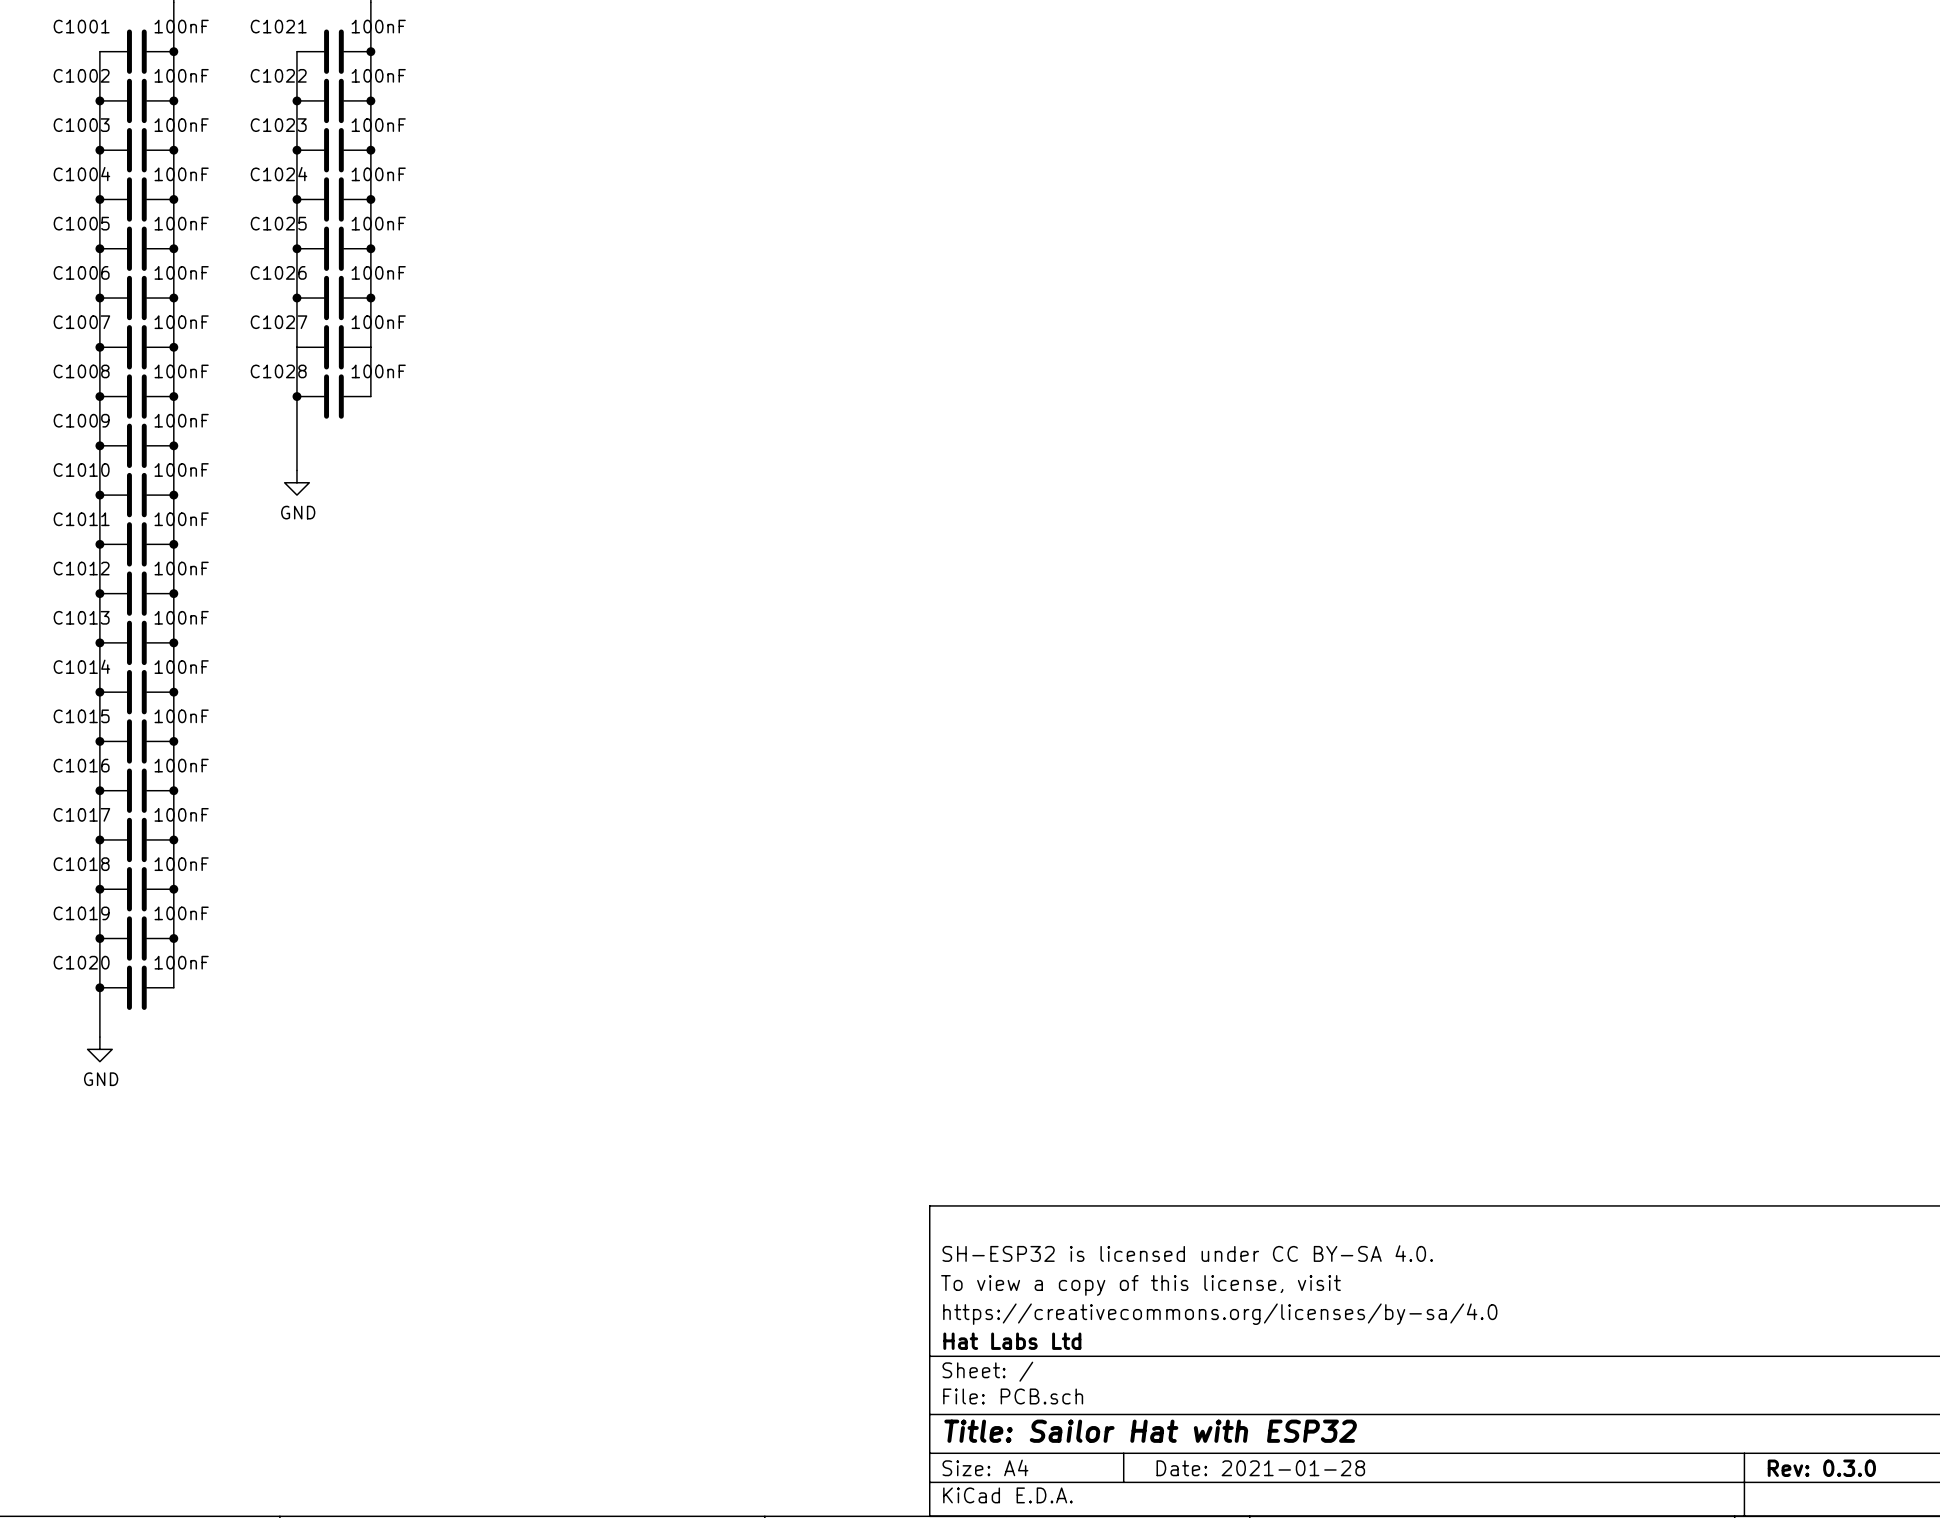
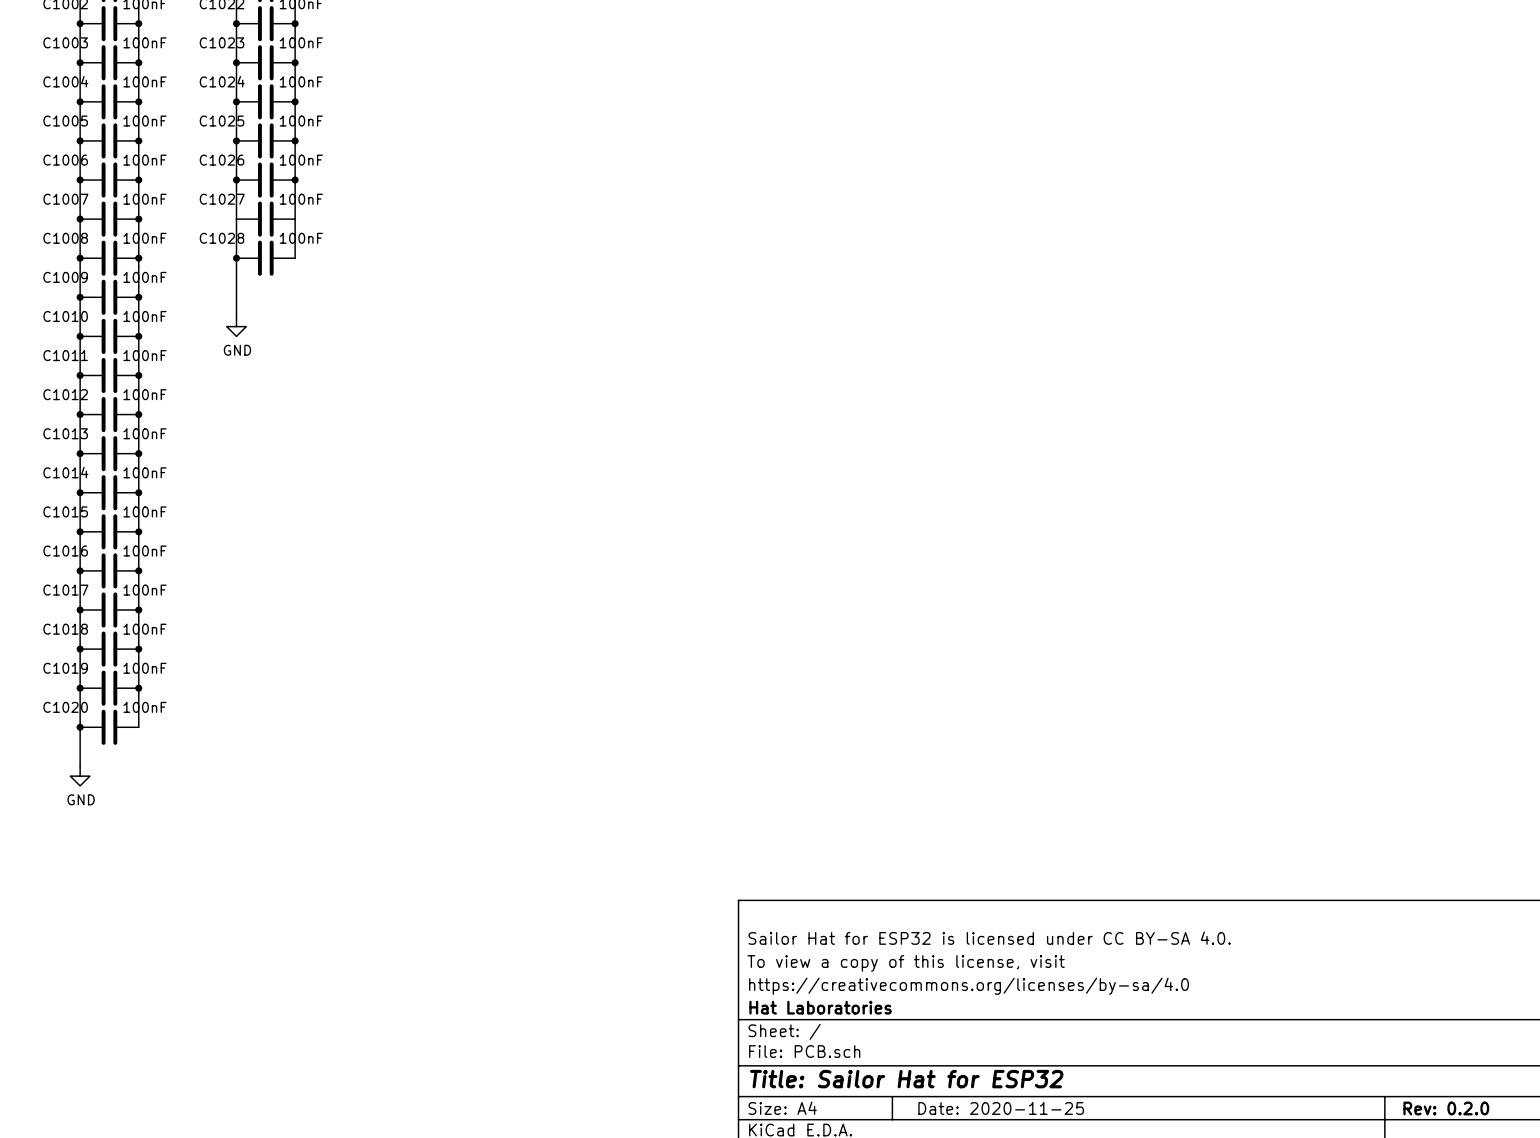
title block: SH-ESP32 is licensed under CC BY-SA 4.0. (1187, 1253) -> Sailor Hat for ESP32 is licensed under CC BY-SA 4.0. (989, 938)
title block: Hat Labs Ltd (1012, 1341) -> Hat Laboratories (820, 1007)
title block: Title: Sailor Hat with ESP32 (1150, 1431) -> Title: Sailor Hat for ESP32 (906, 1079)
title block: Date: 2021-01-28 (1260, 1468) -> Date: 2020-11-25 (1001, 1108)
title block: Rev: 0.3.0 (1821, 1468) -> Rev: 0.2.0 (1446, 1108)

